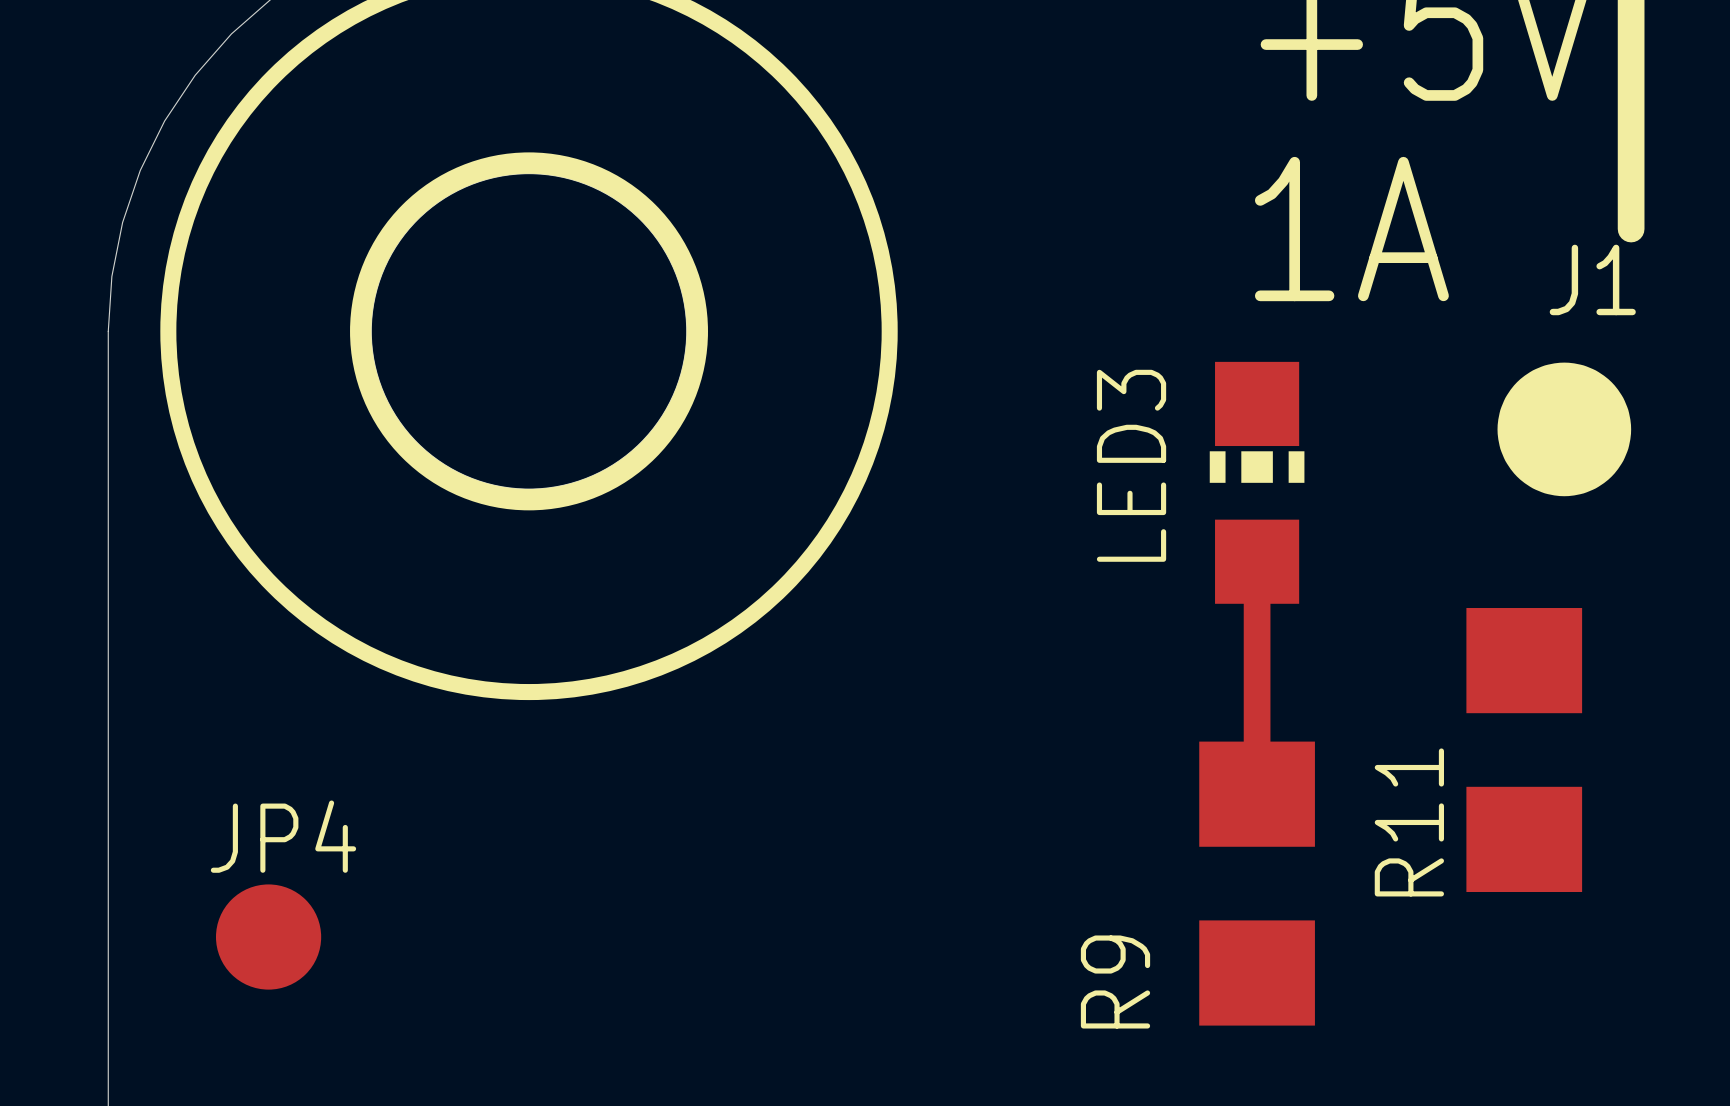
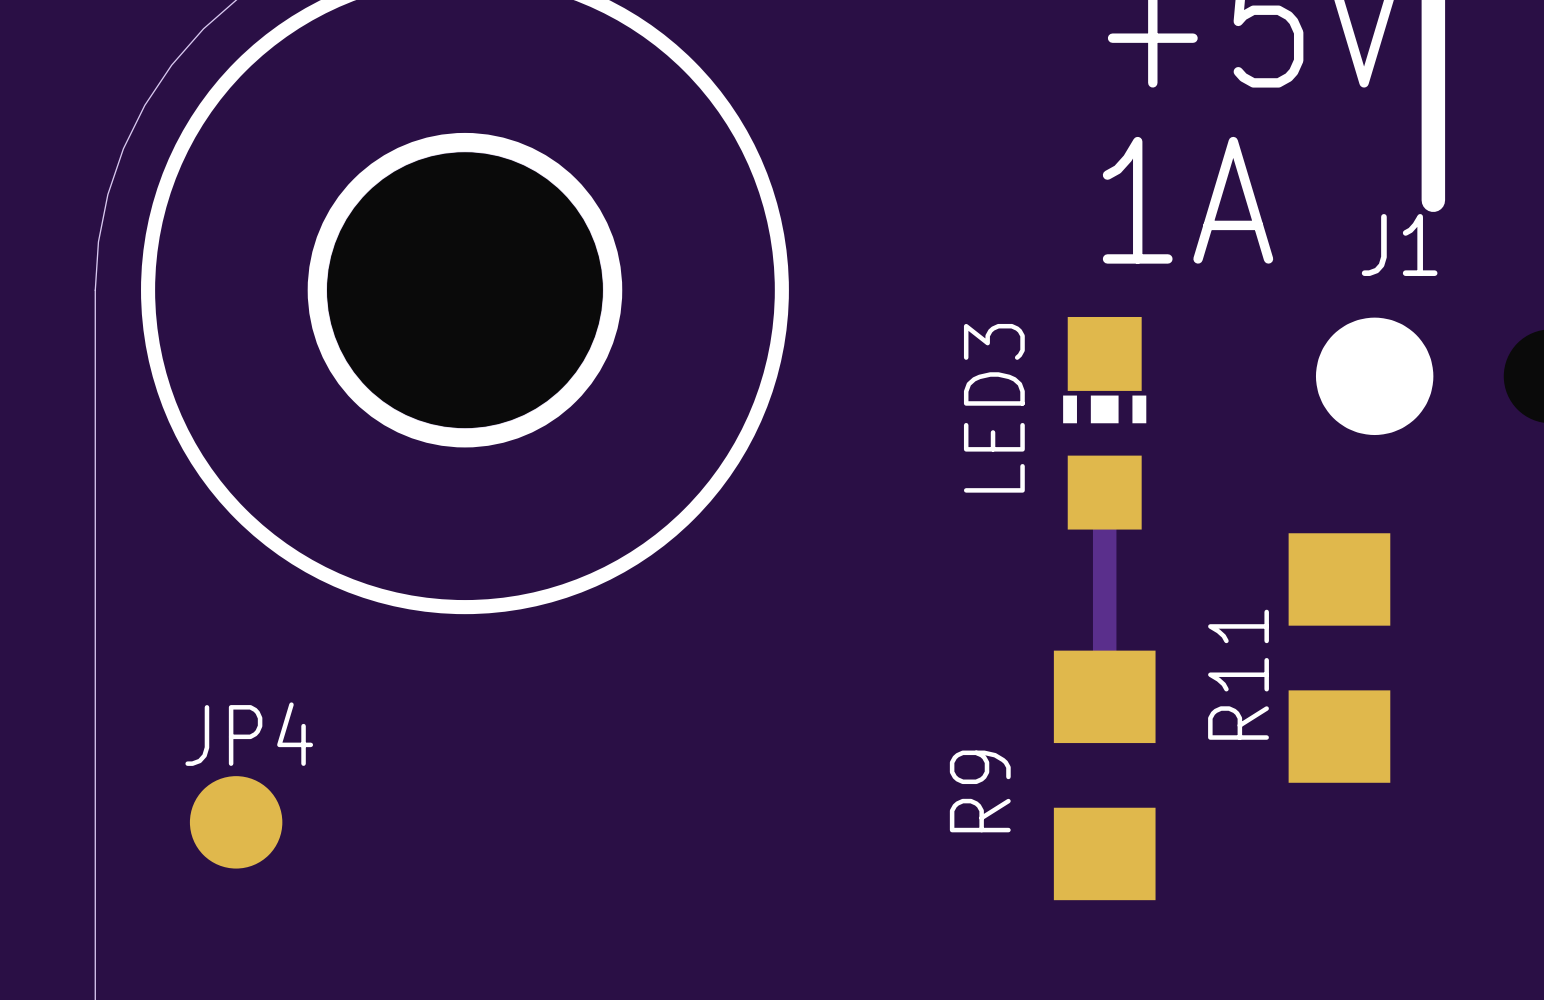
R11 name position: R11 (1409, 822) -> R11 (1238, 674)
R9 name position: R9 (1115, 981) -> R9 (980, 791)

